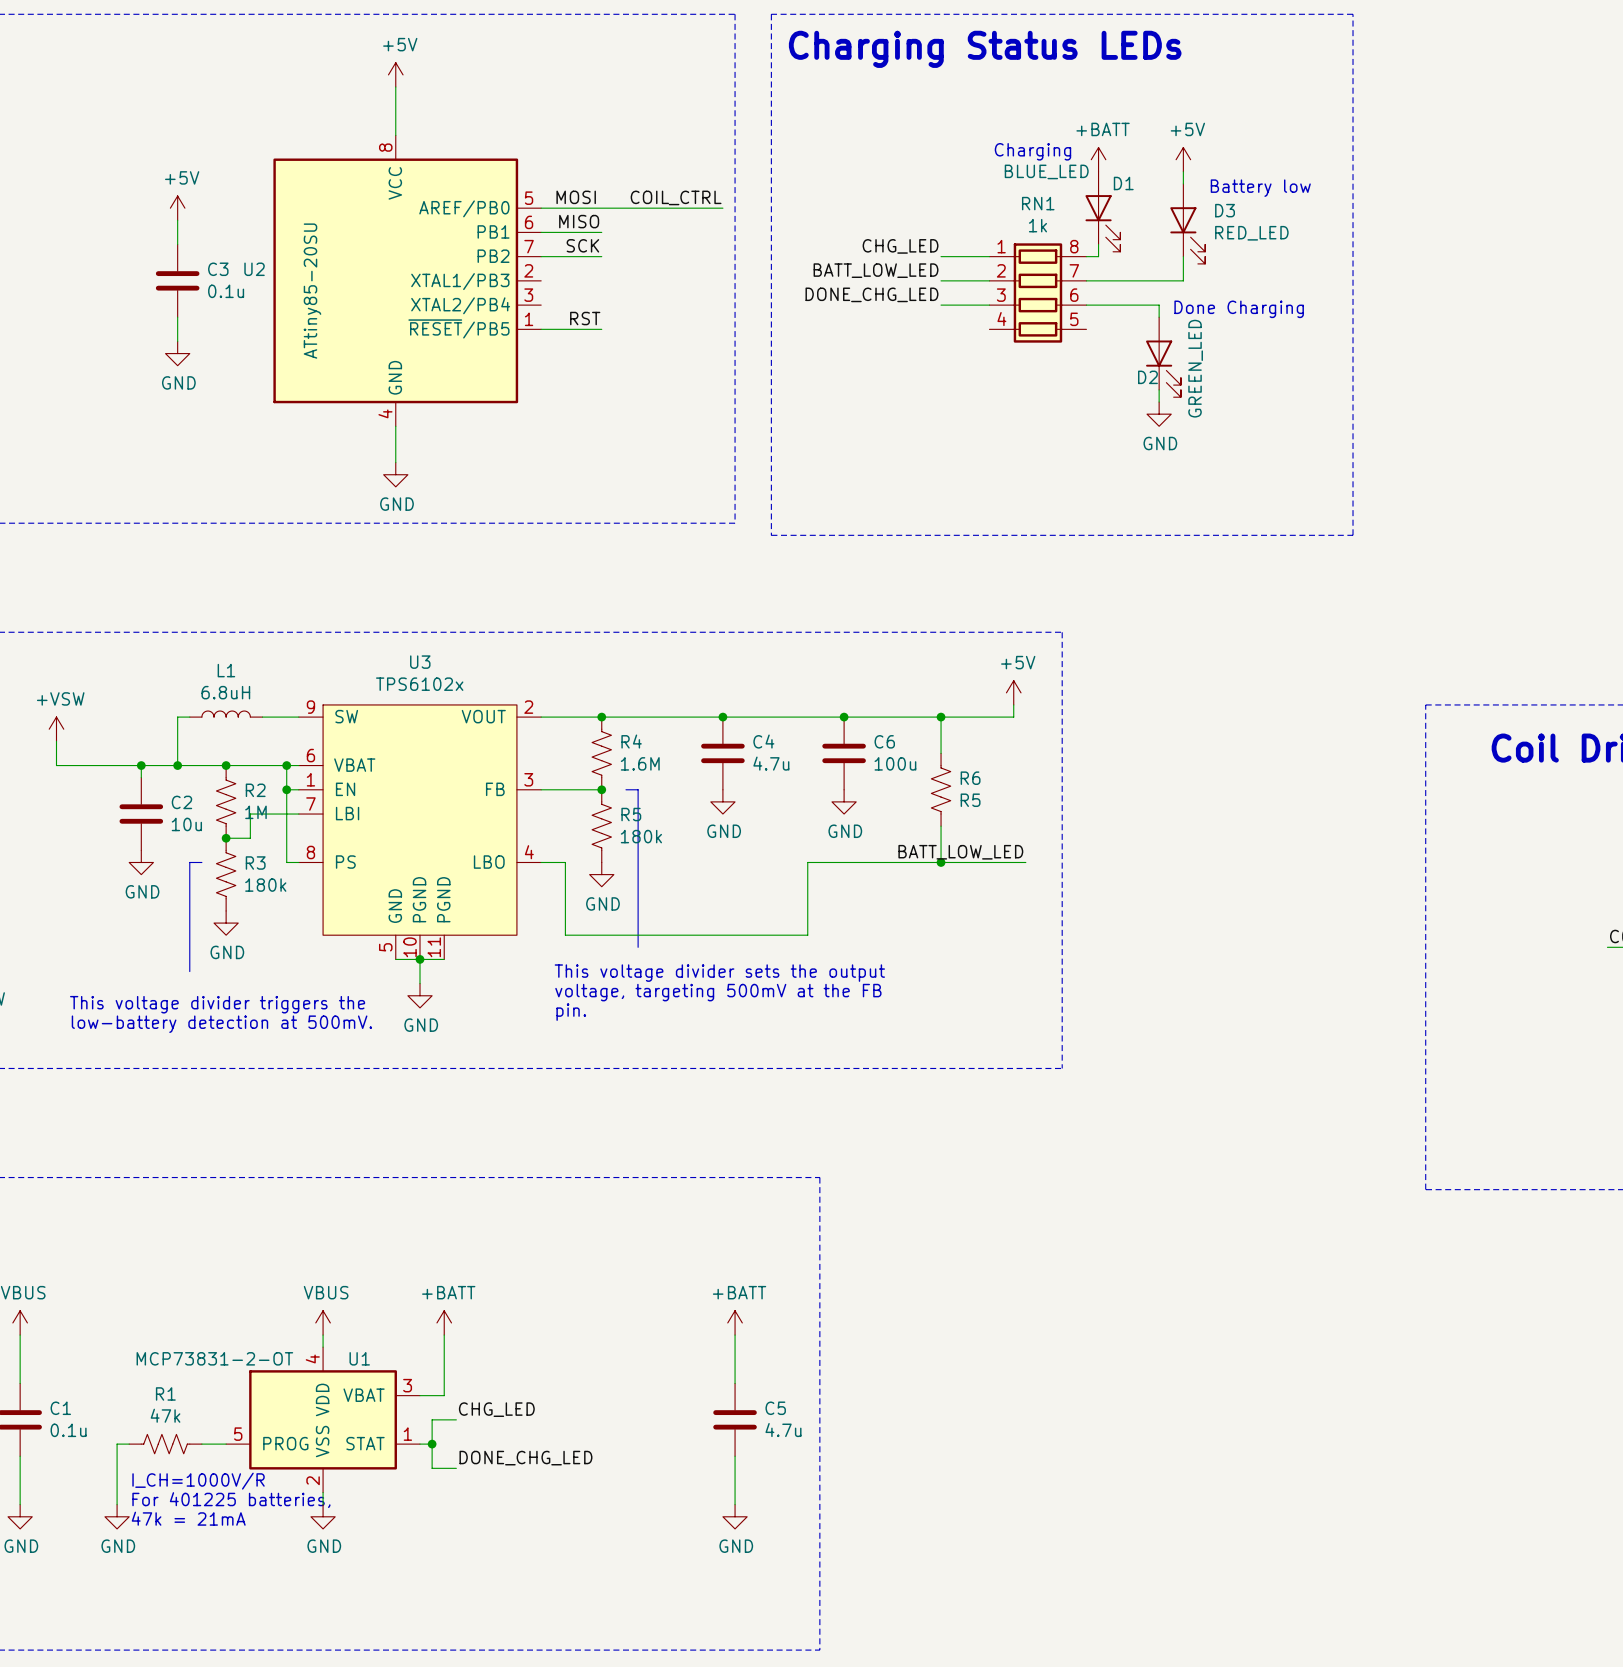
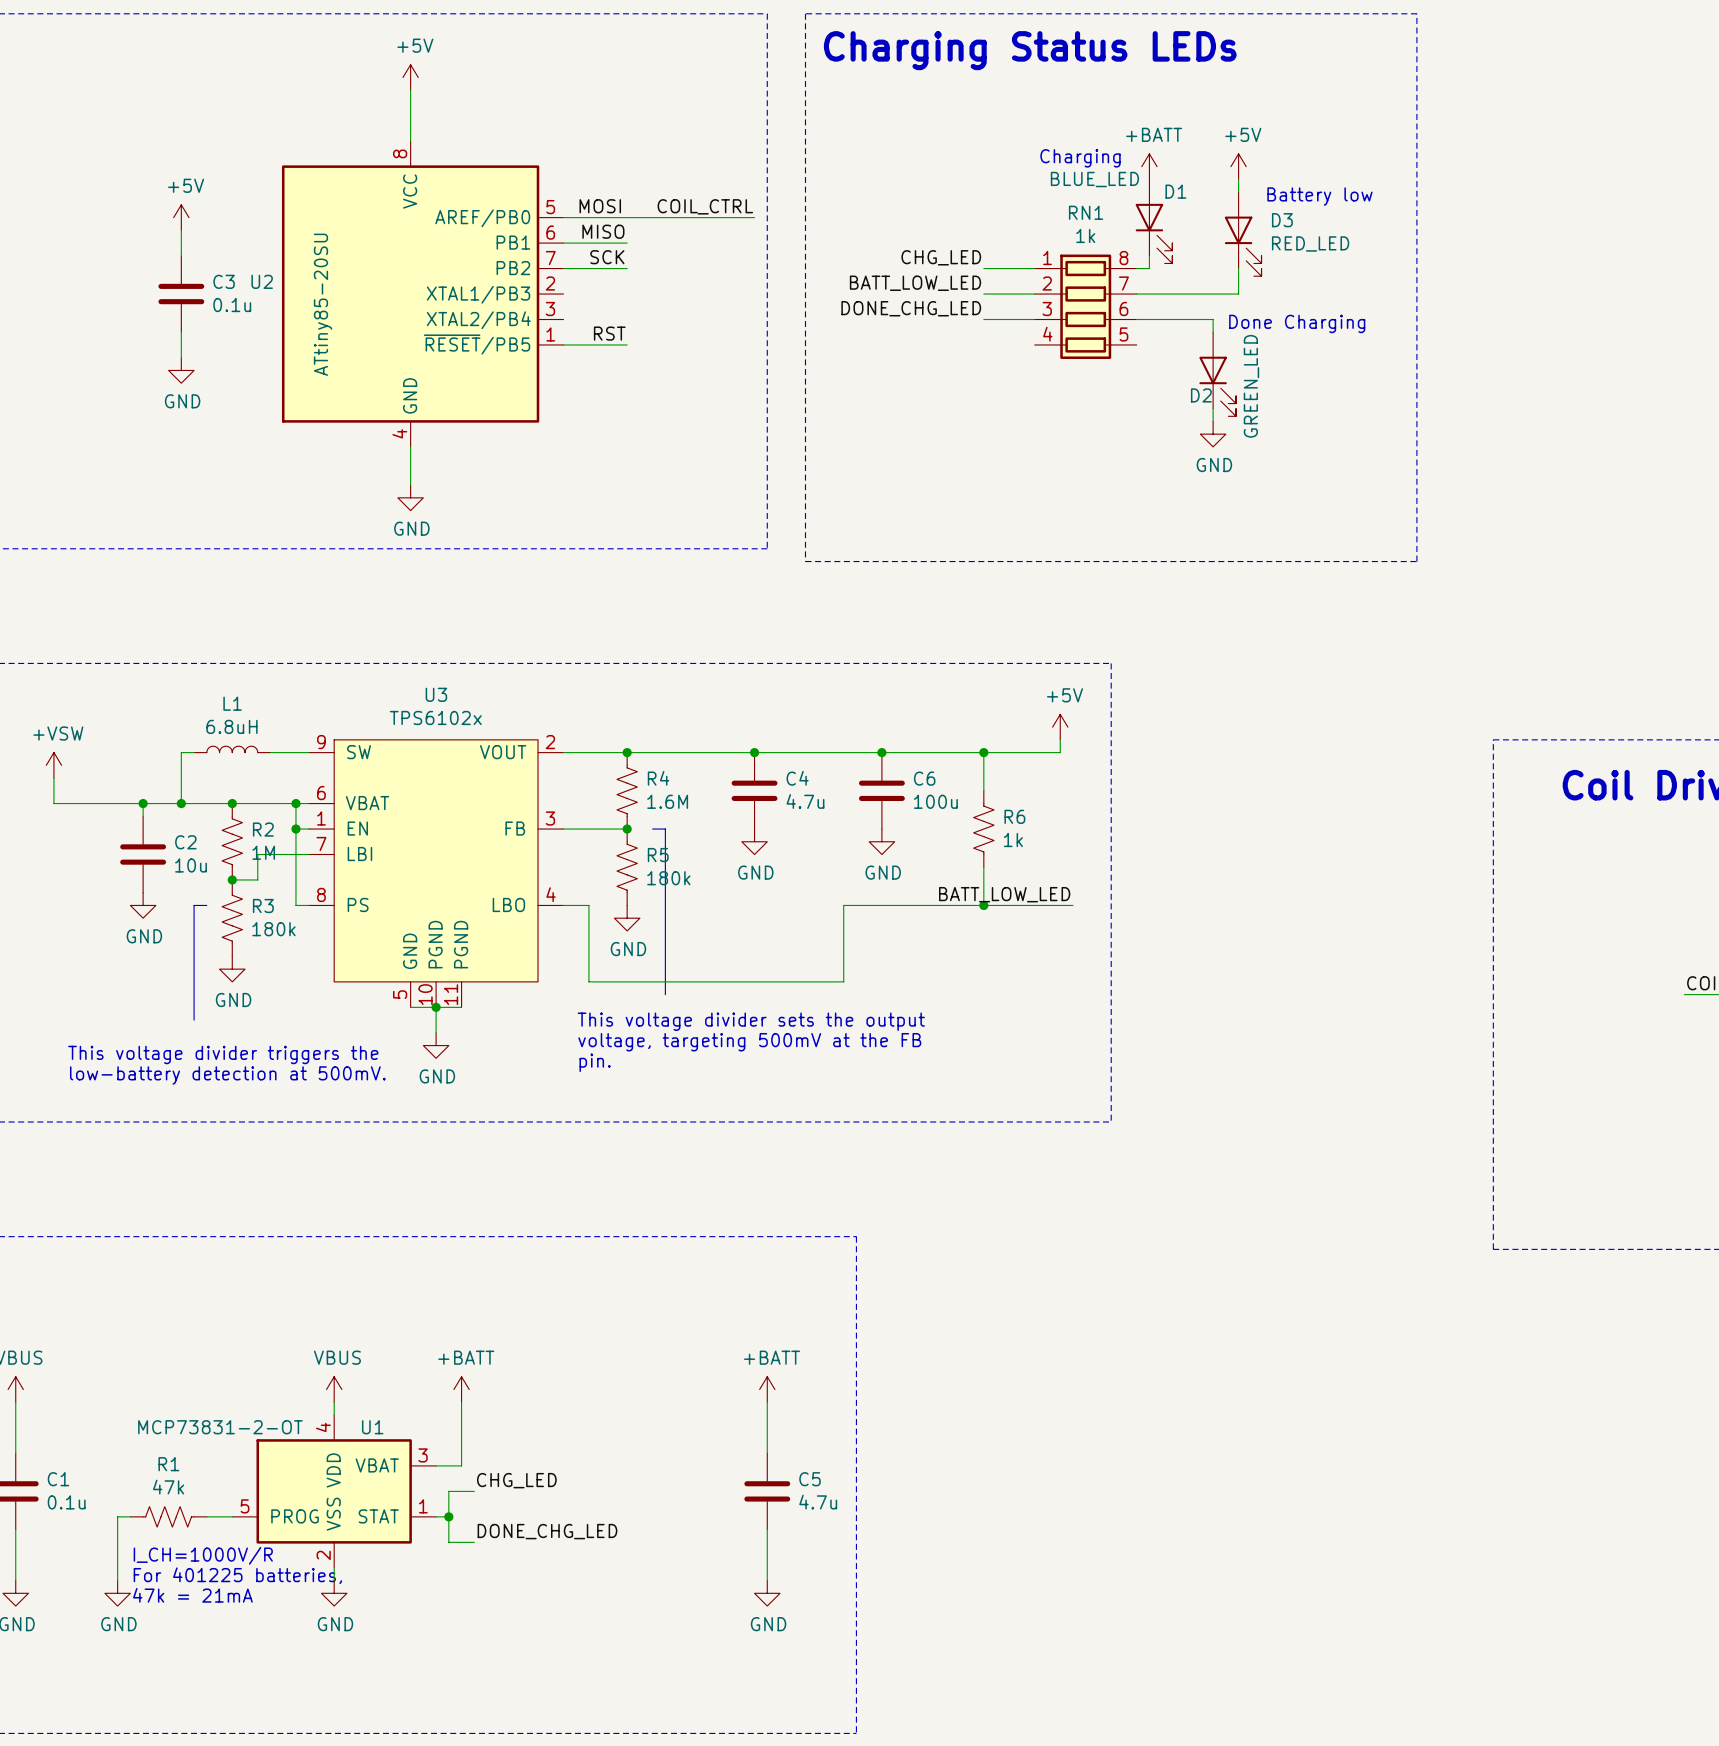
R6 value: R5 (970, 800) -> 1k (1013, 840)

